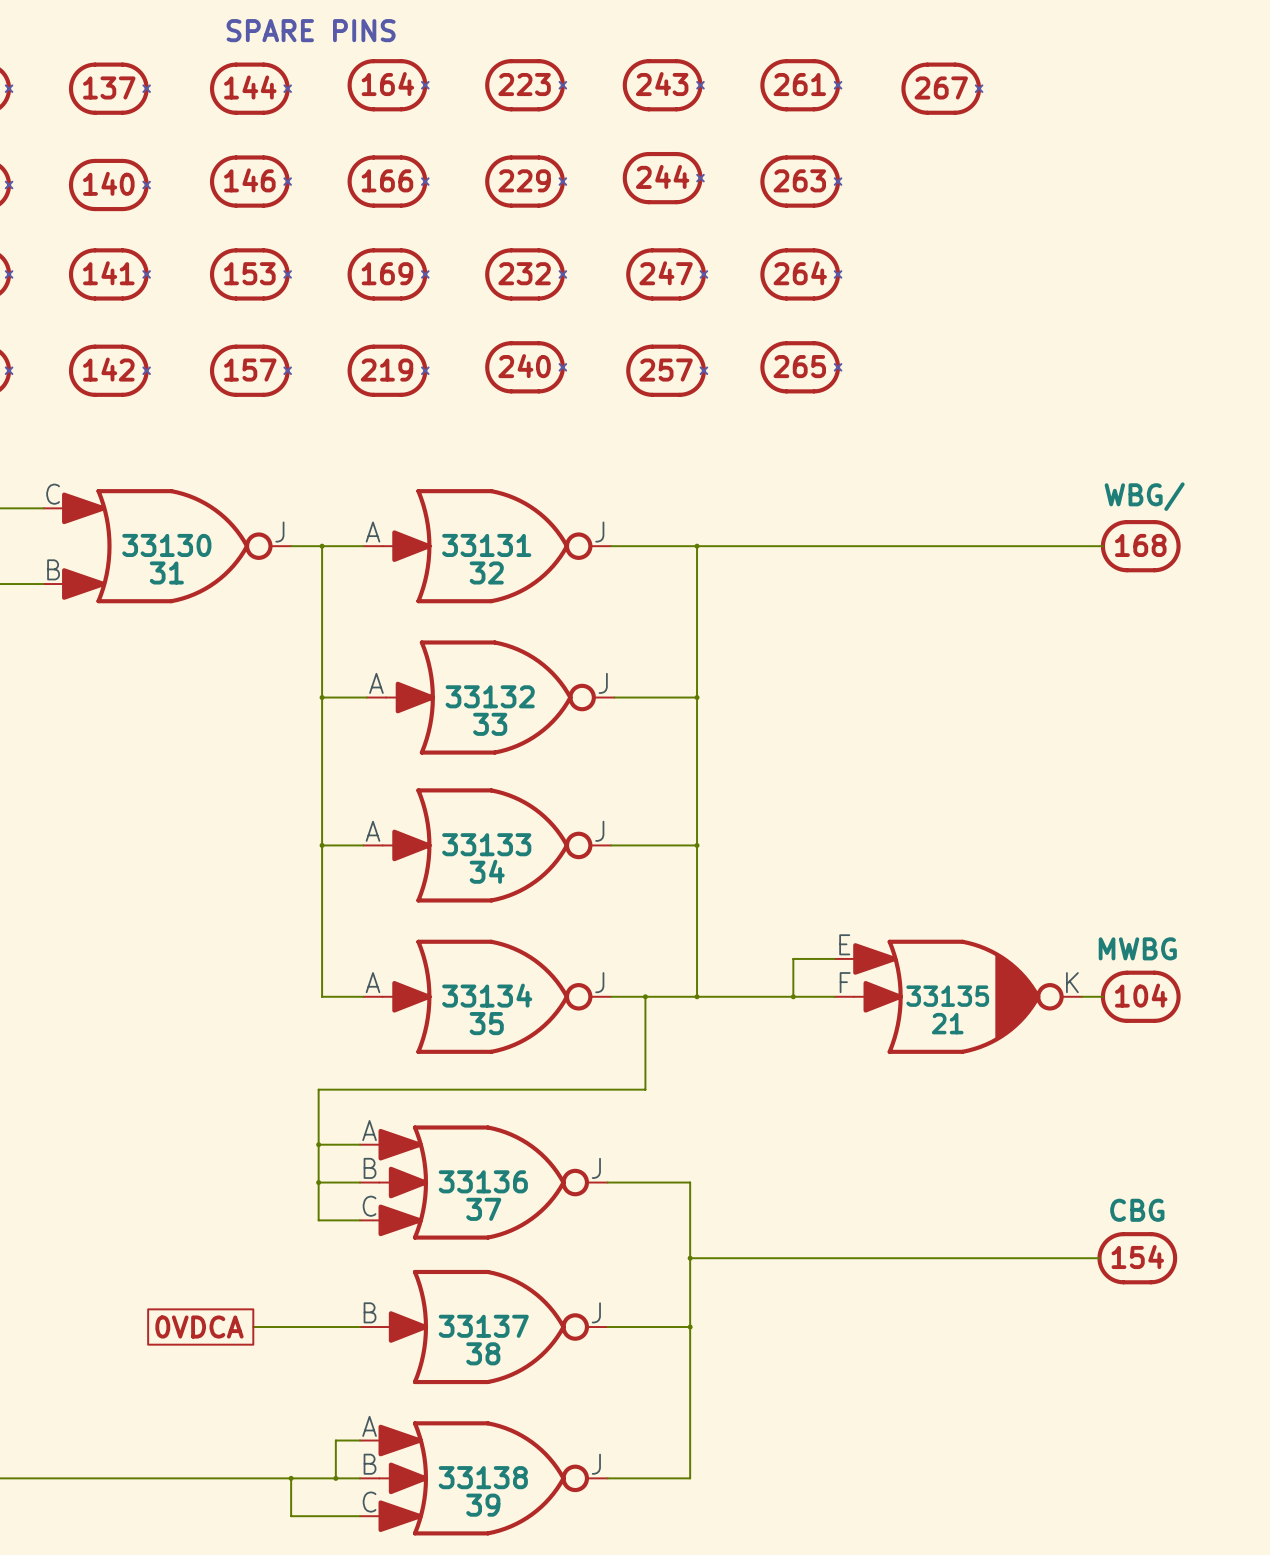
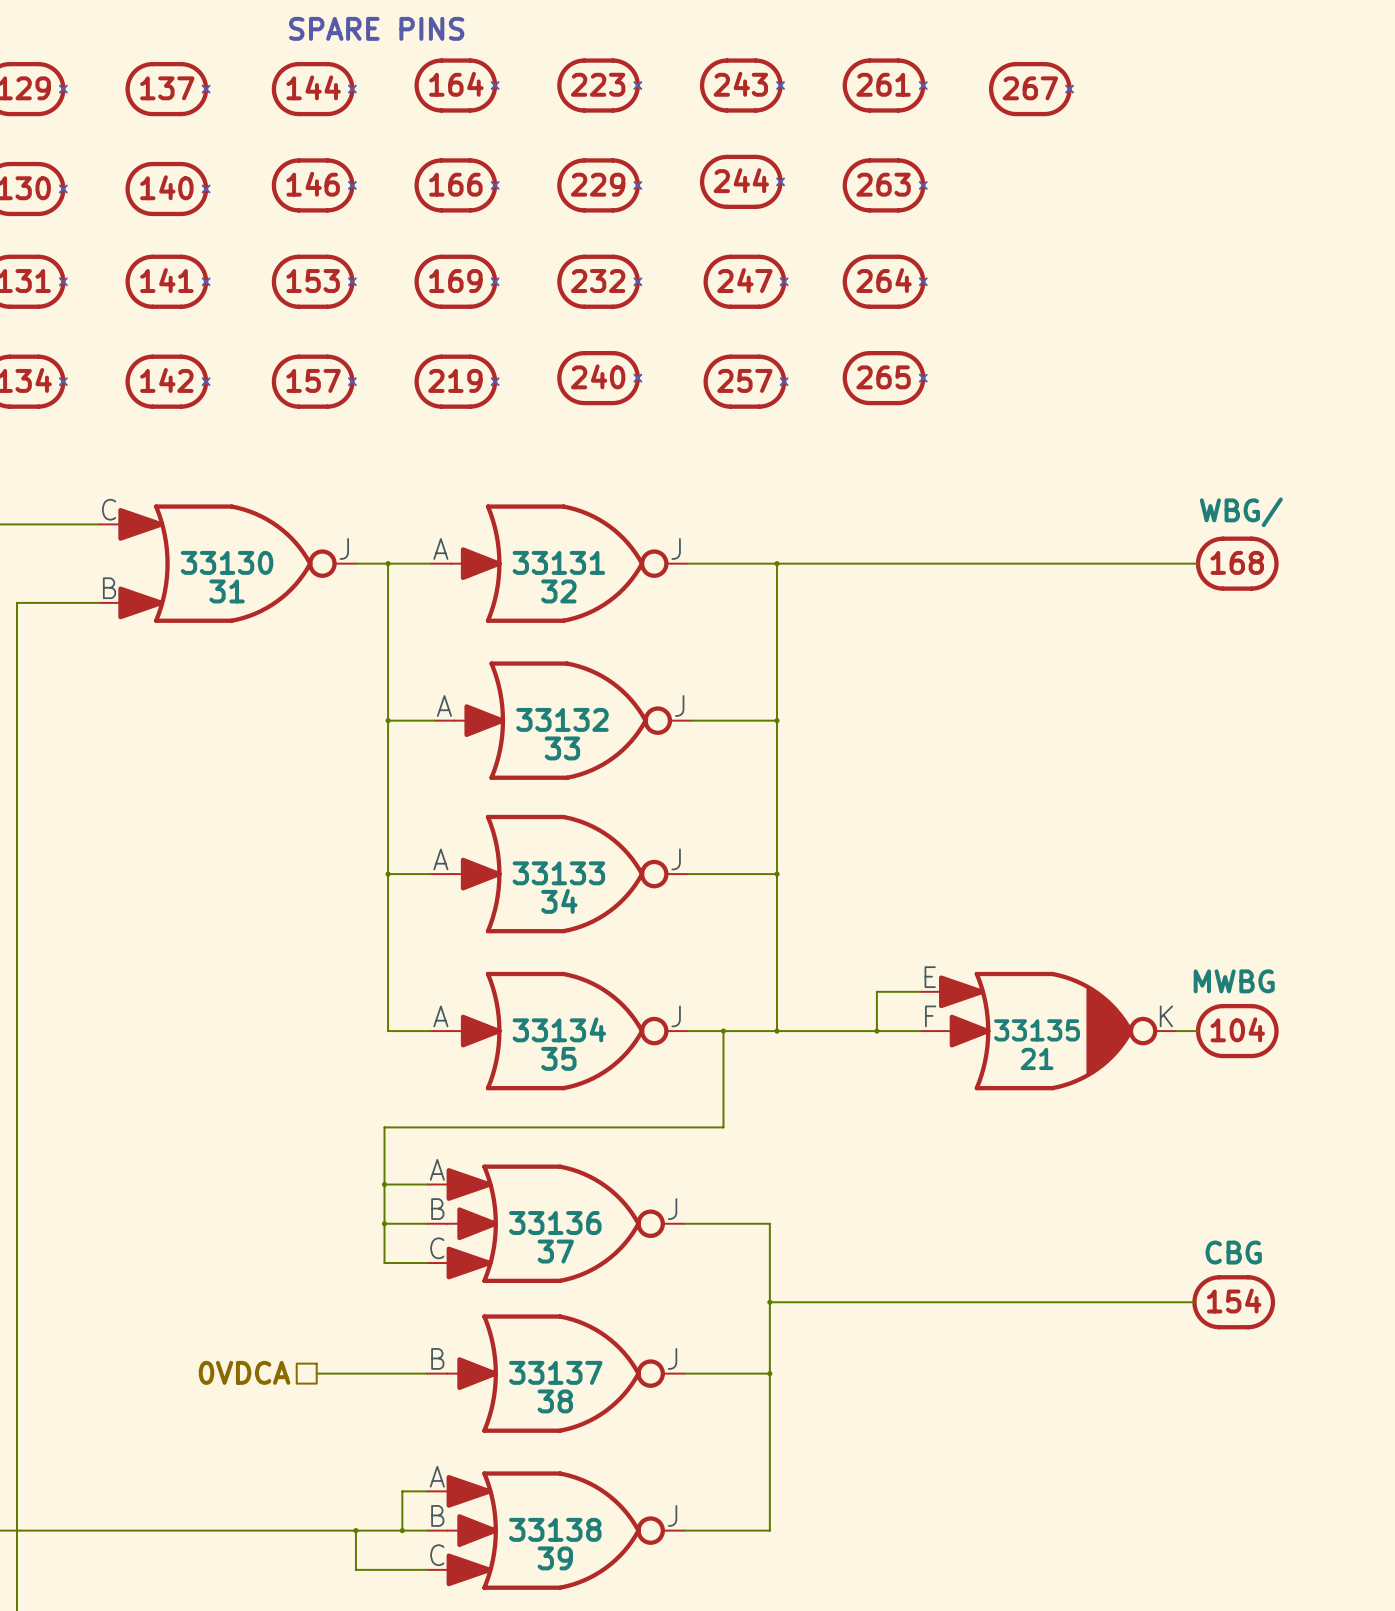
hierarchical label: none -> 0VDCA (244, 1372)
global label: 0VDCA (199, 1327) -> none

